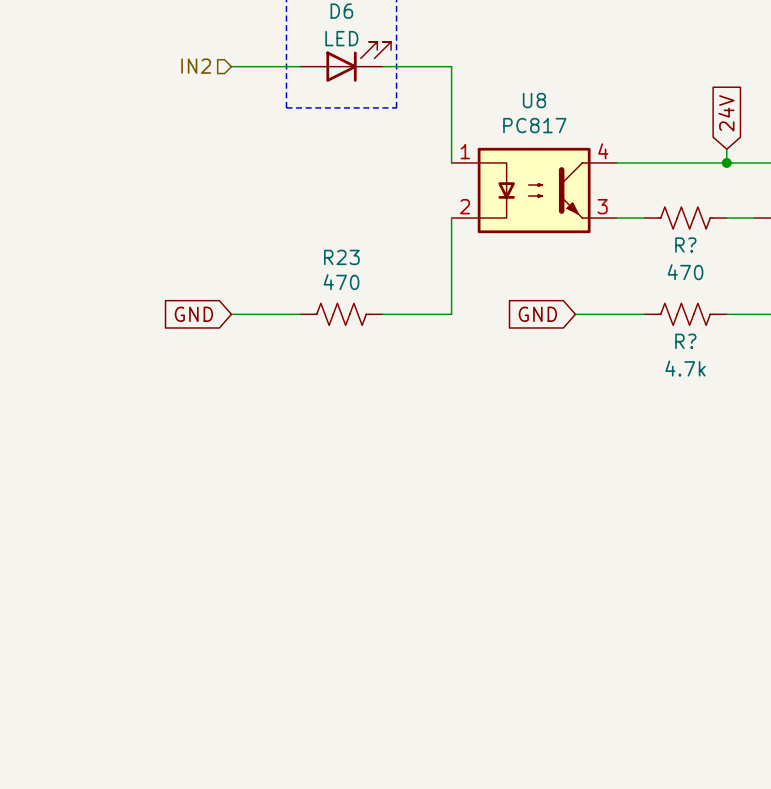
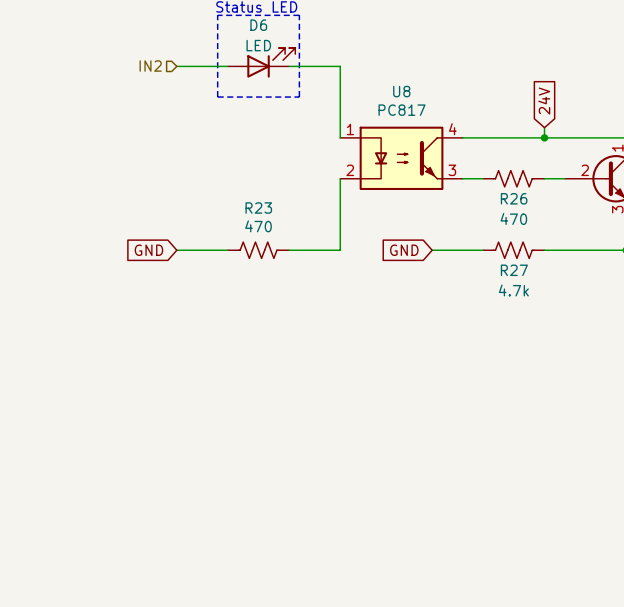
R? name: R? (685, 245) -> R26 (514, 198)
R? name: R? (685, 341) -> R27 (514, 270)

